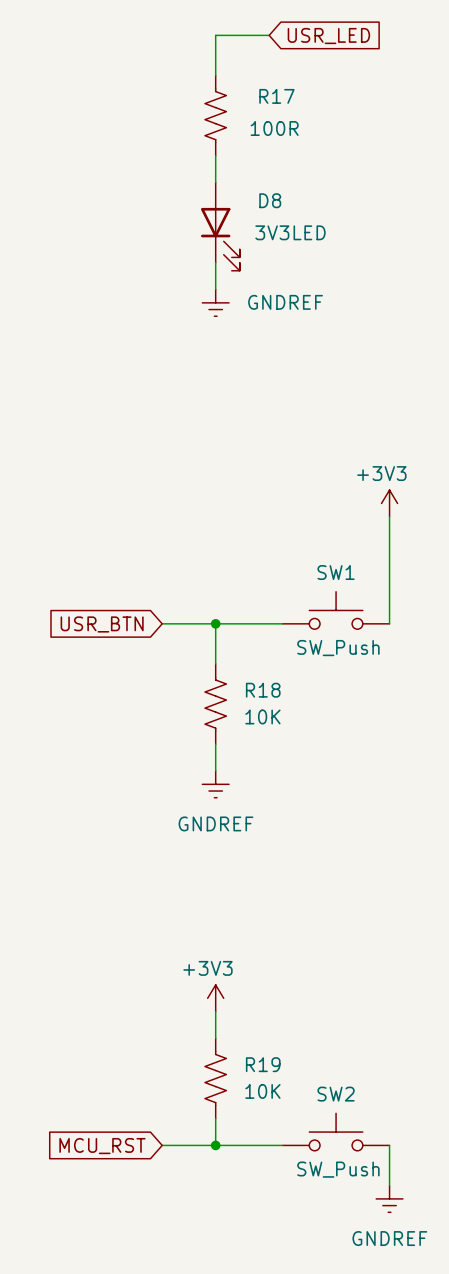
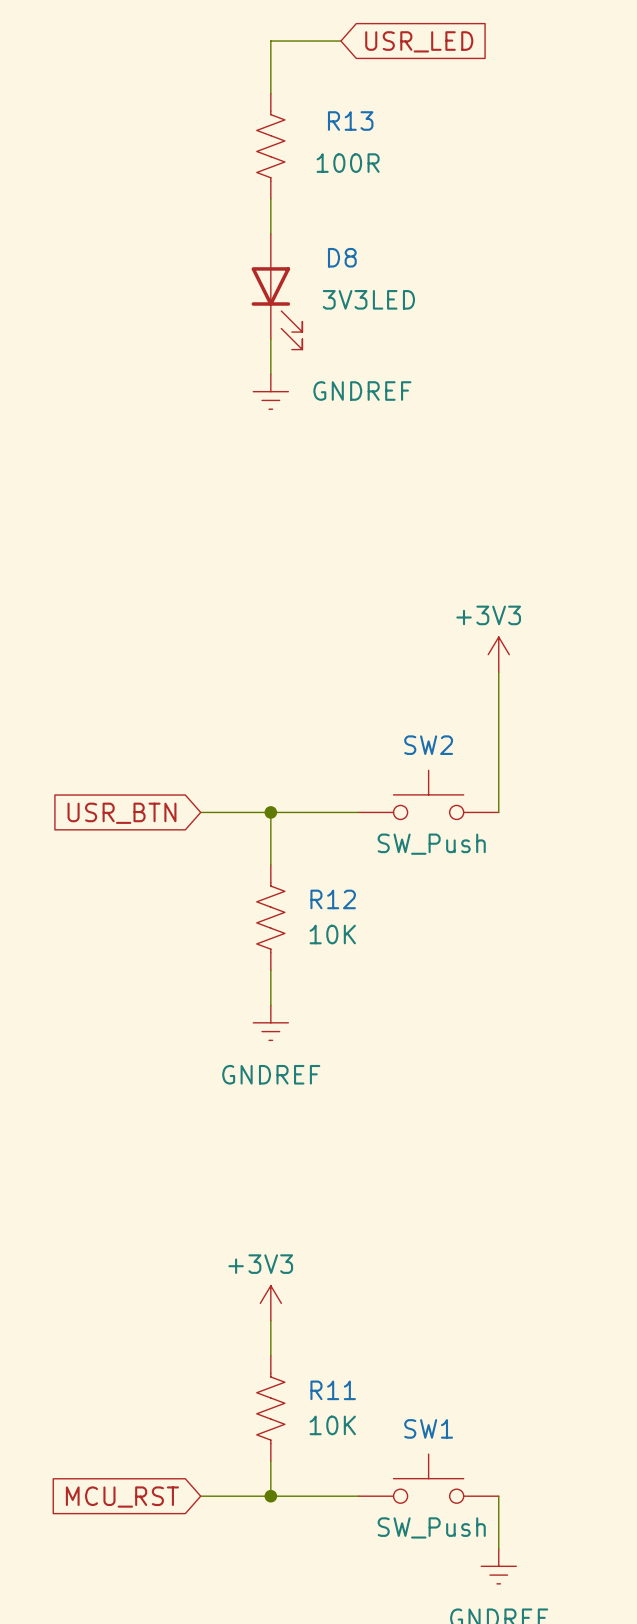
R17 name: R17 (276, 96) -> R13 (350, 121)
SW1 name: SW1 (336, 572) -> SW2 (428, 745)
R18 name: R18 (263, 690) -> R12 (333, 899)
R19 name: R19 (263, 1064) -> R11 (333, 1390)
SW2 name: SW2 (336, 1094) -> SW1 (428, 1428)

